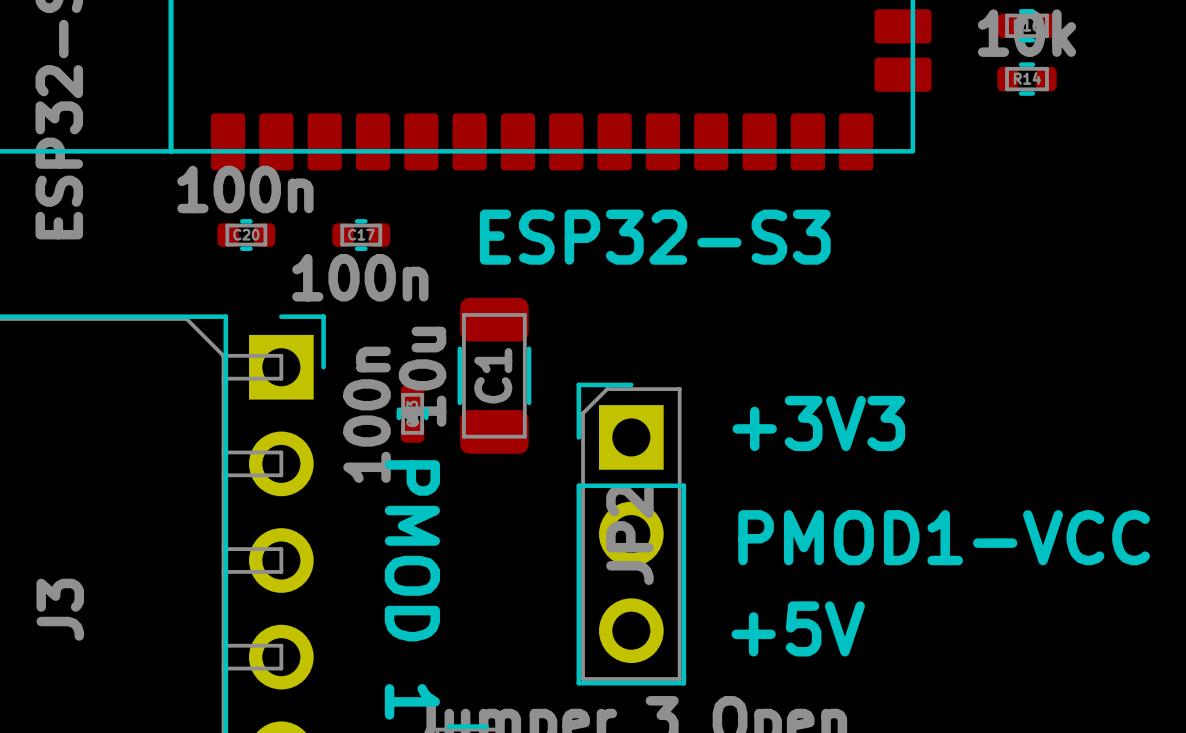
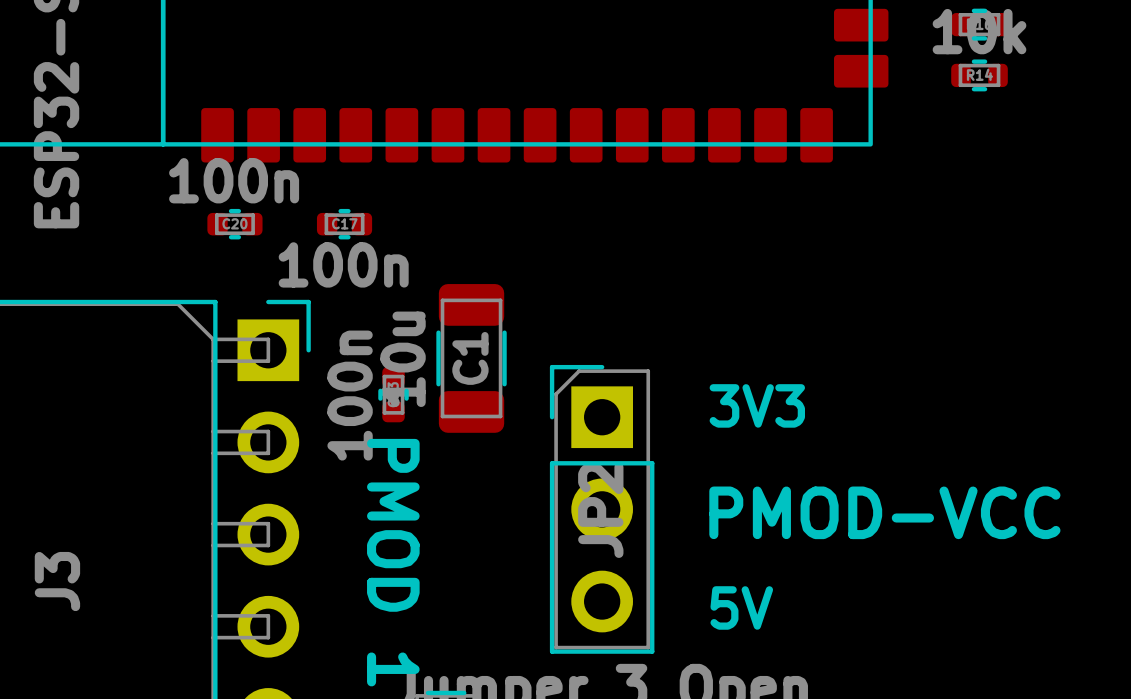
text: ESP32-S3 (655, 237) -> none
text: +3V3 (818, 423) -> 3V3 (757, 405)
text: PMOD1-VCC (944, 537) -> PMOD-VCC (884, 512)
text: +5V (798, 628) -> 5V (741, 607)

